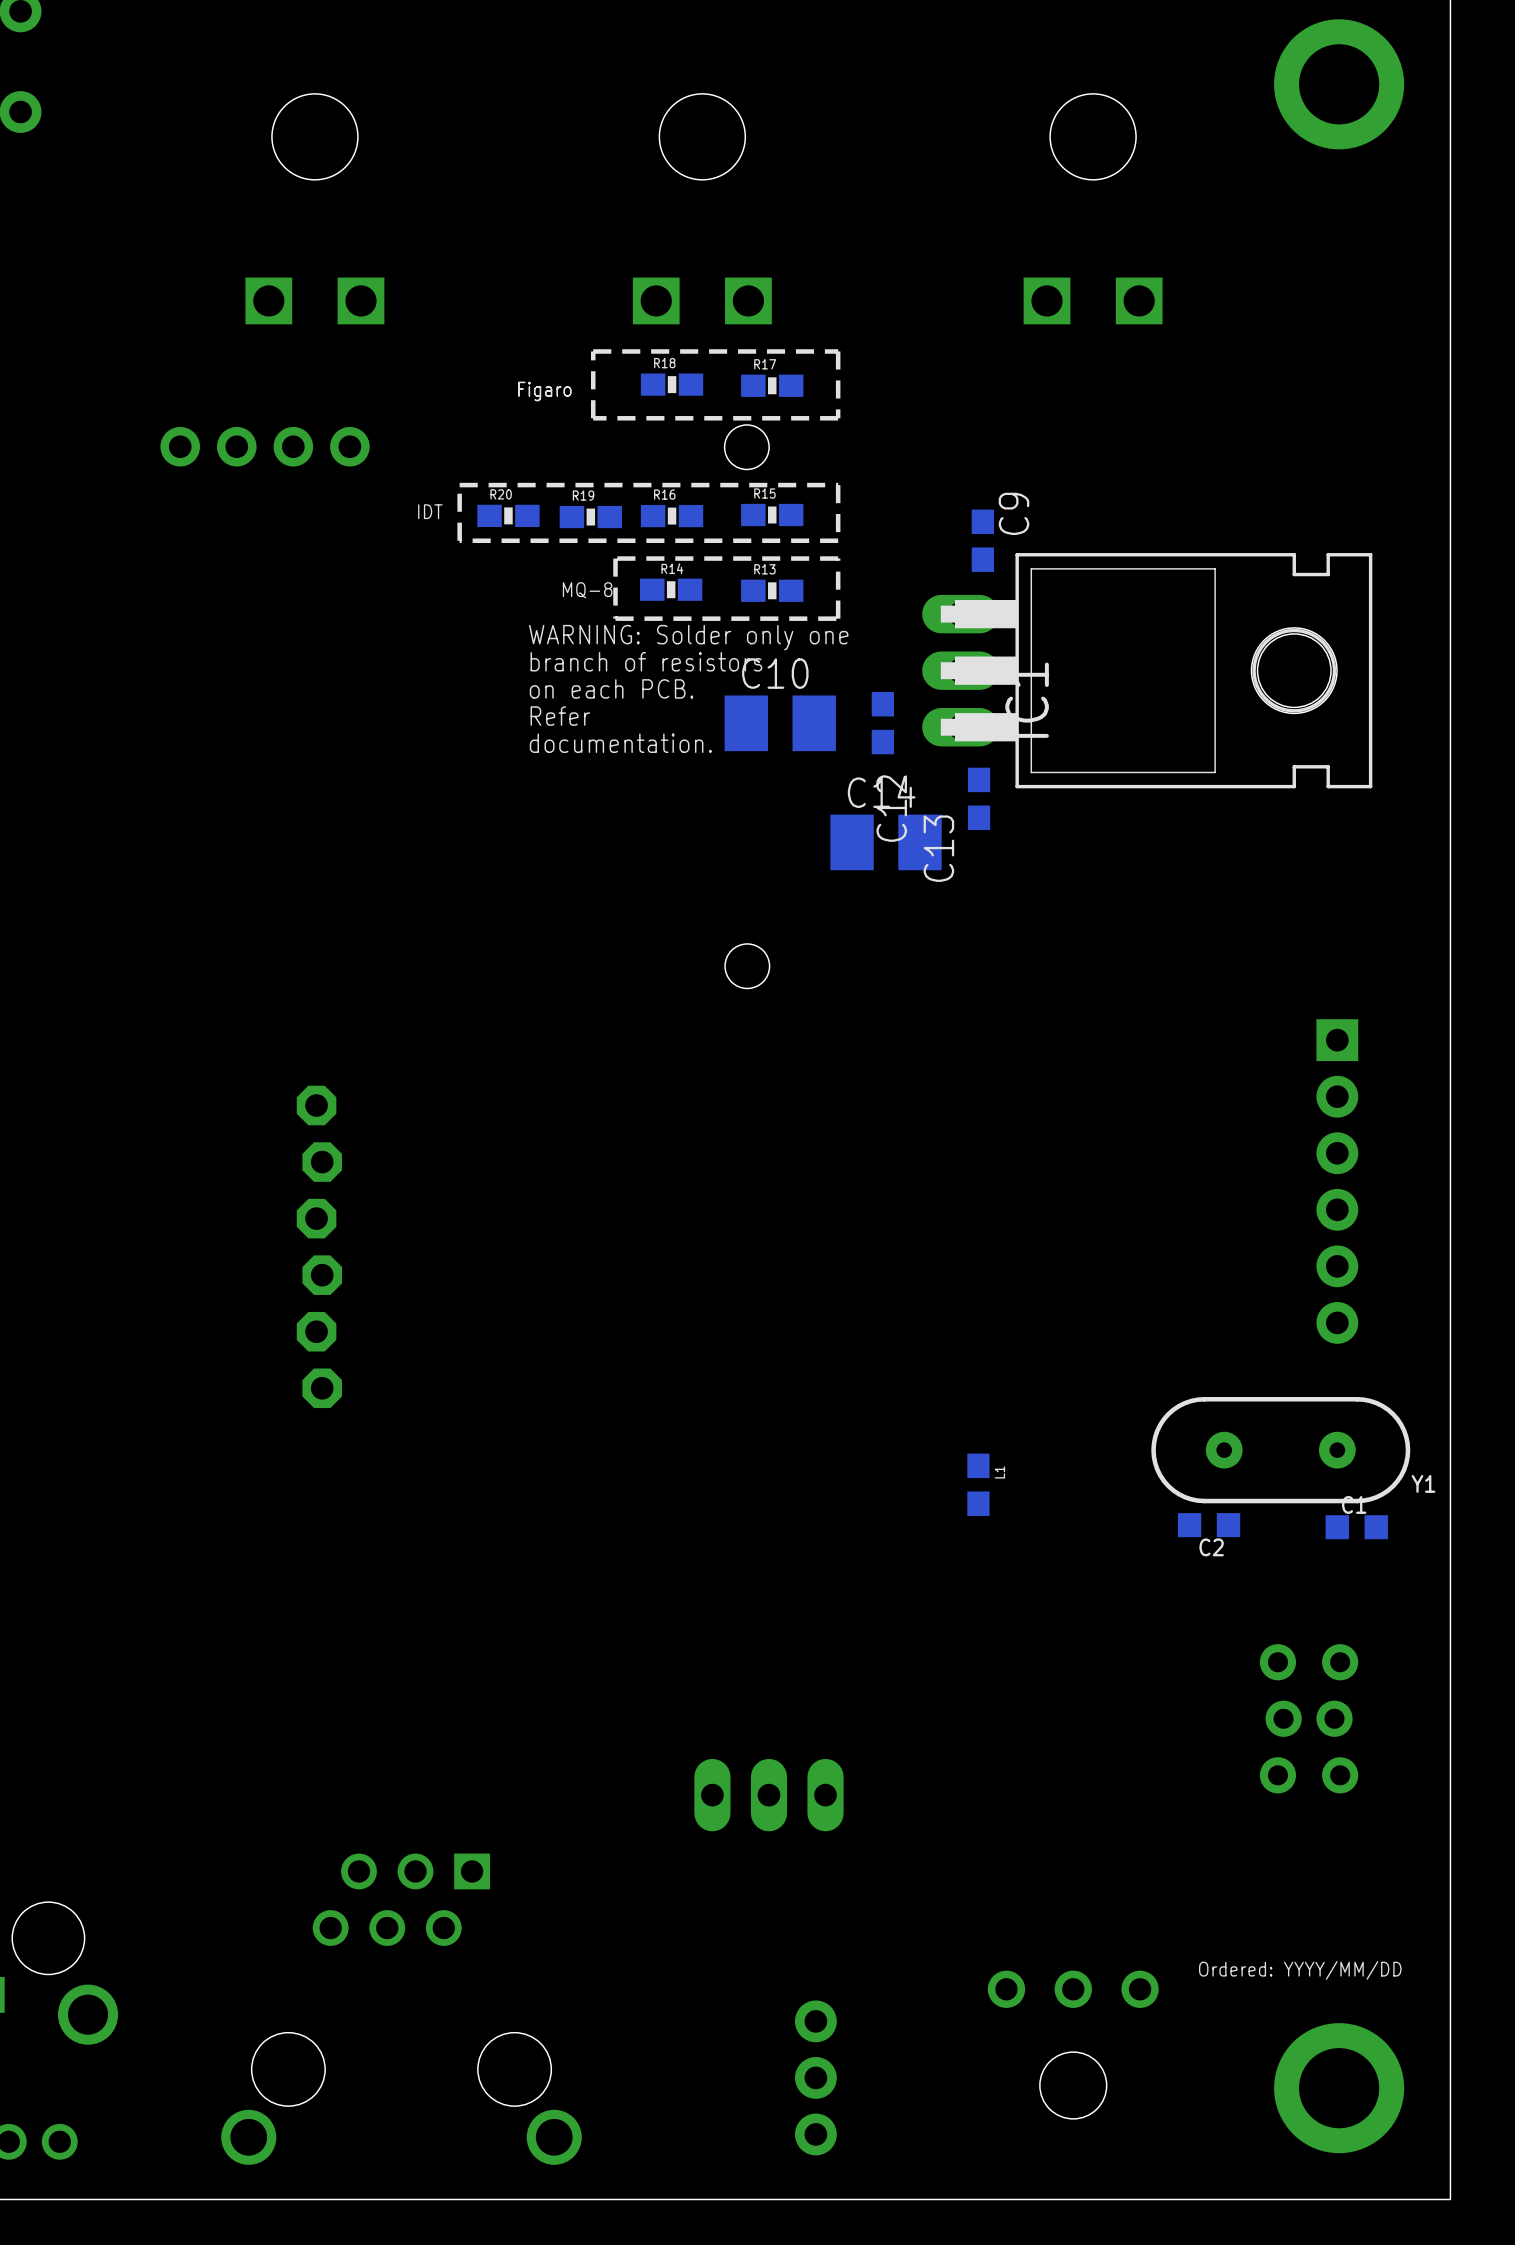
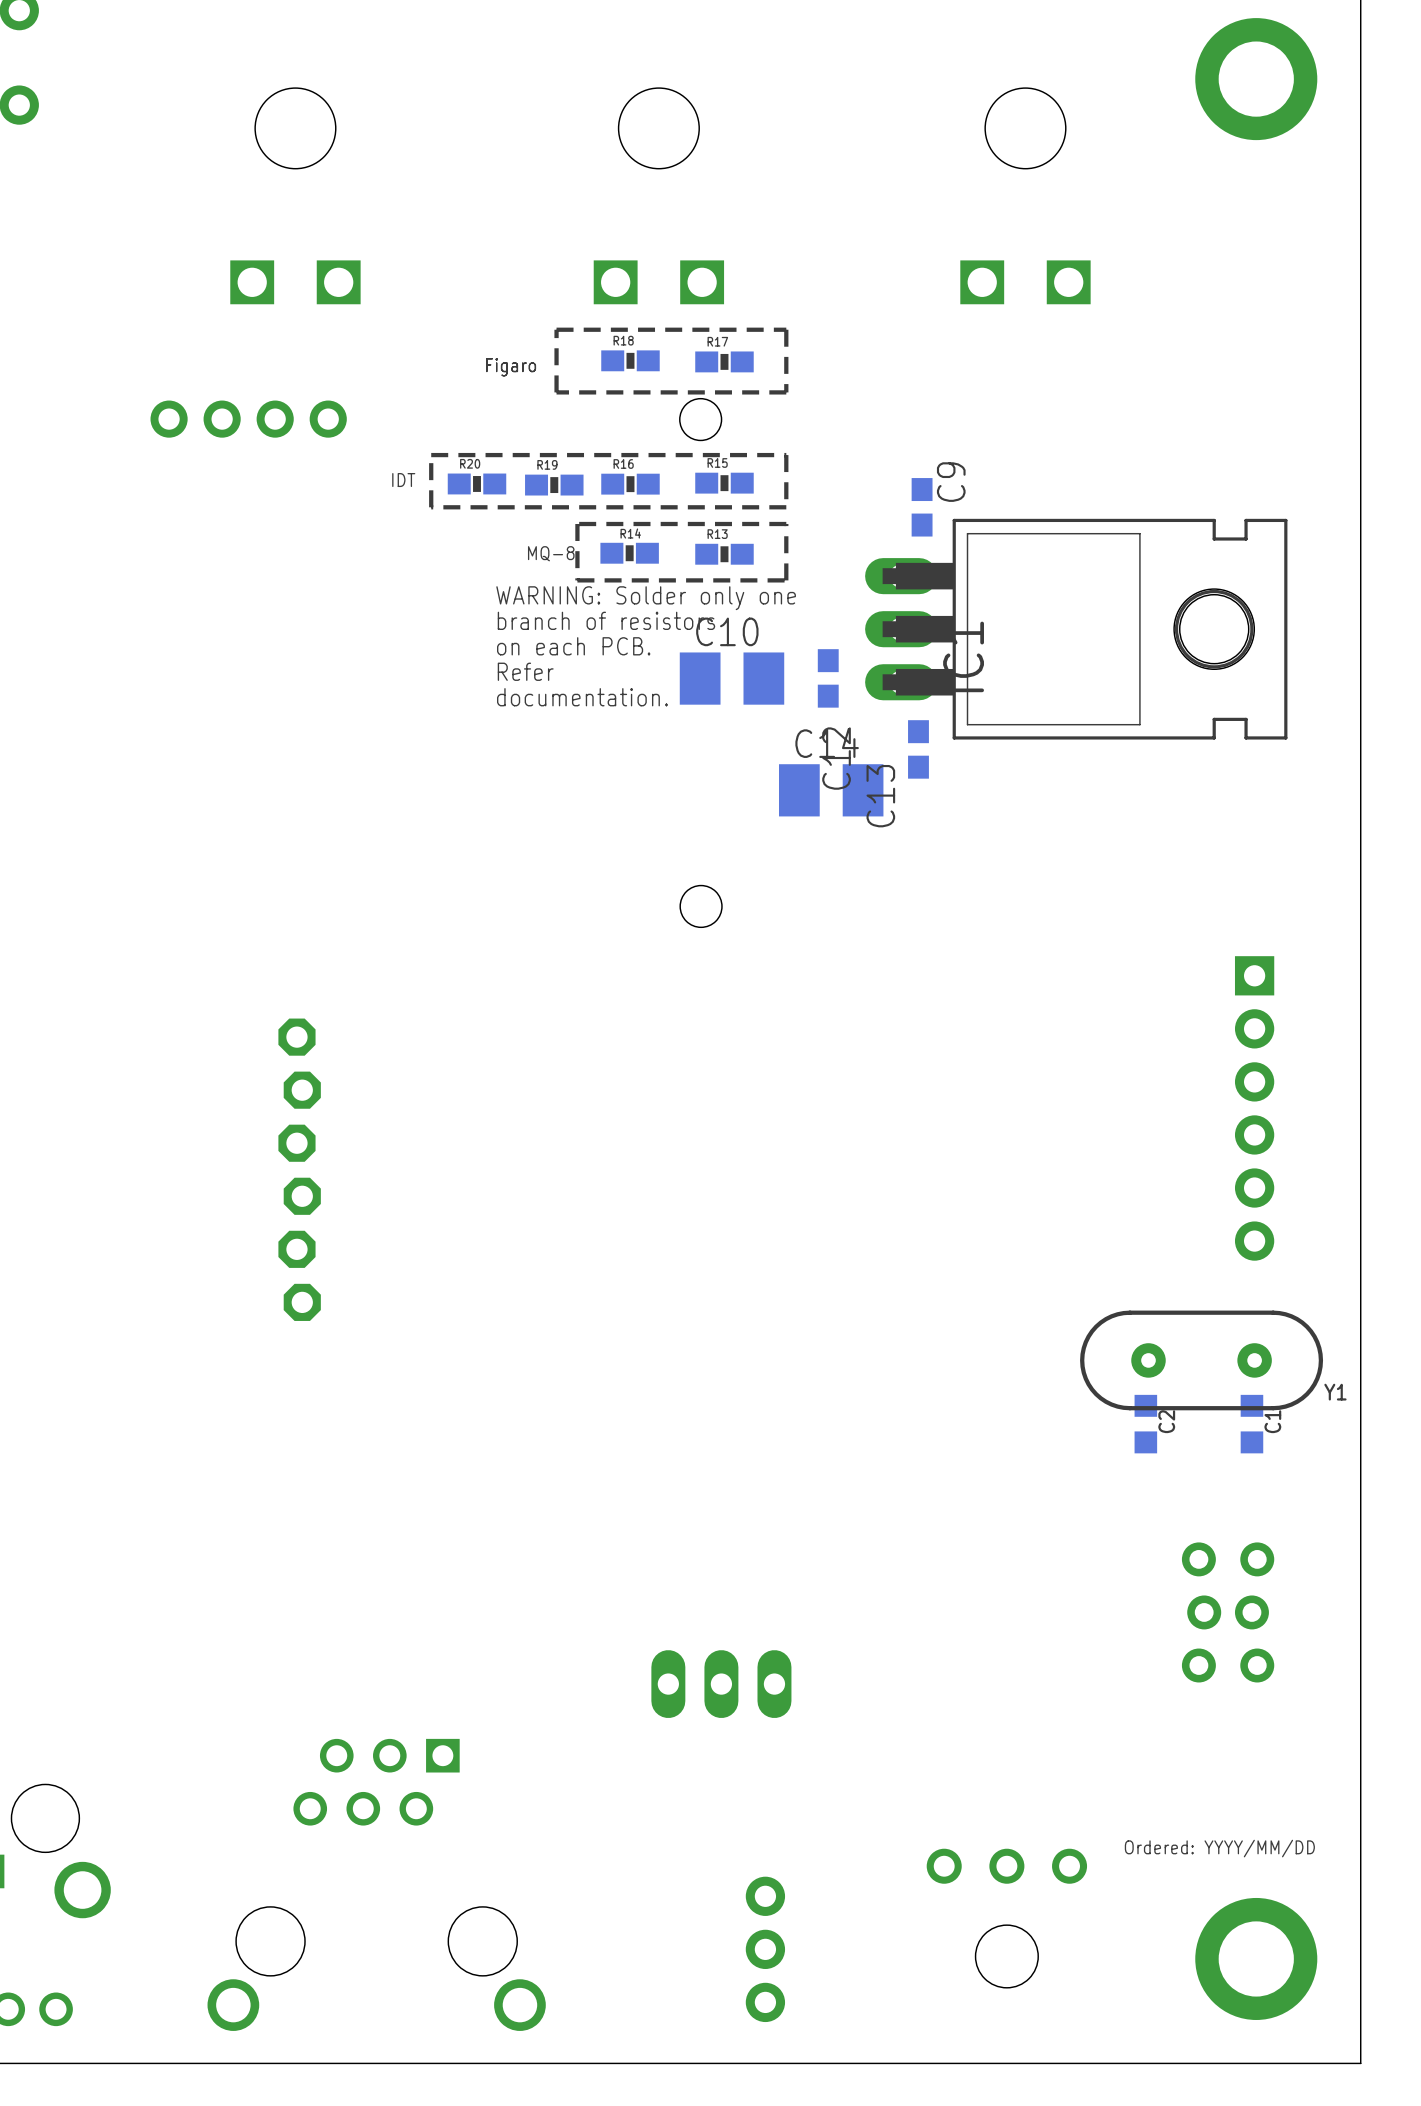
L1: (978, 1484) -> none
C2 rotation: 0° (1209, 1525) -> 90° clockwise (1145, 1424)
C1 rotation: 0° (1356, 1527) -> 90° clockwise (1251, 1424)

